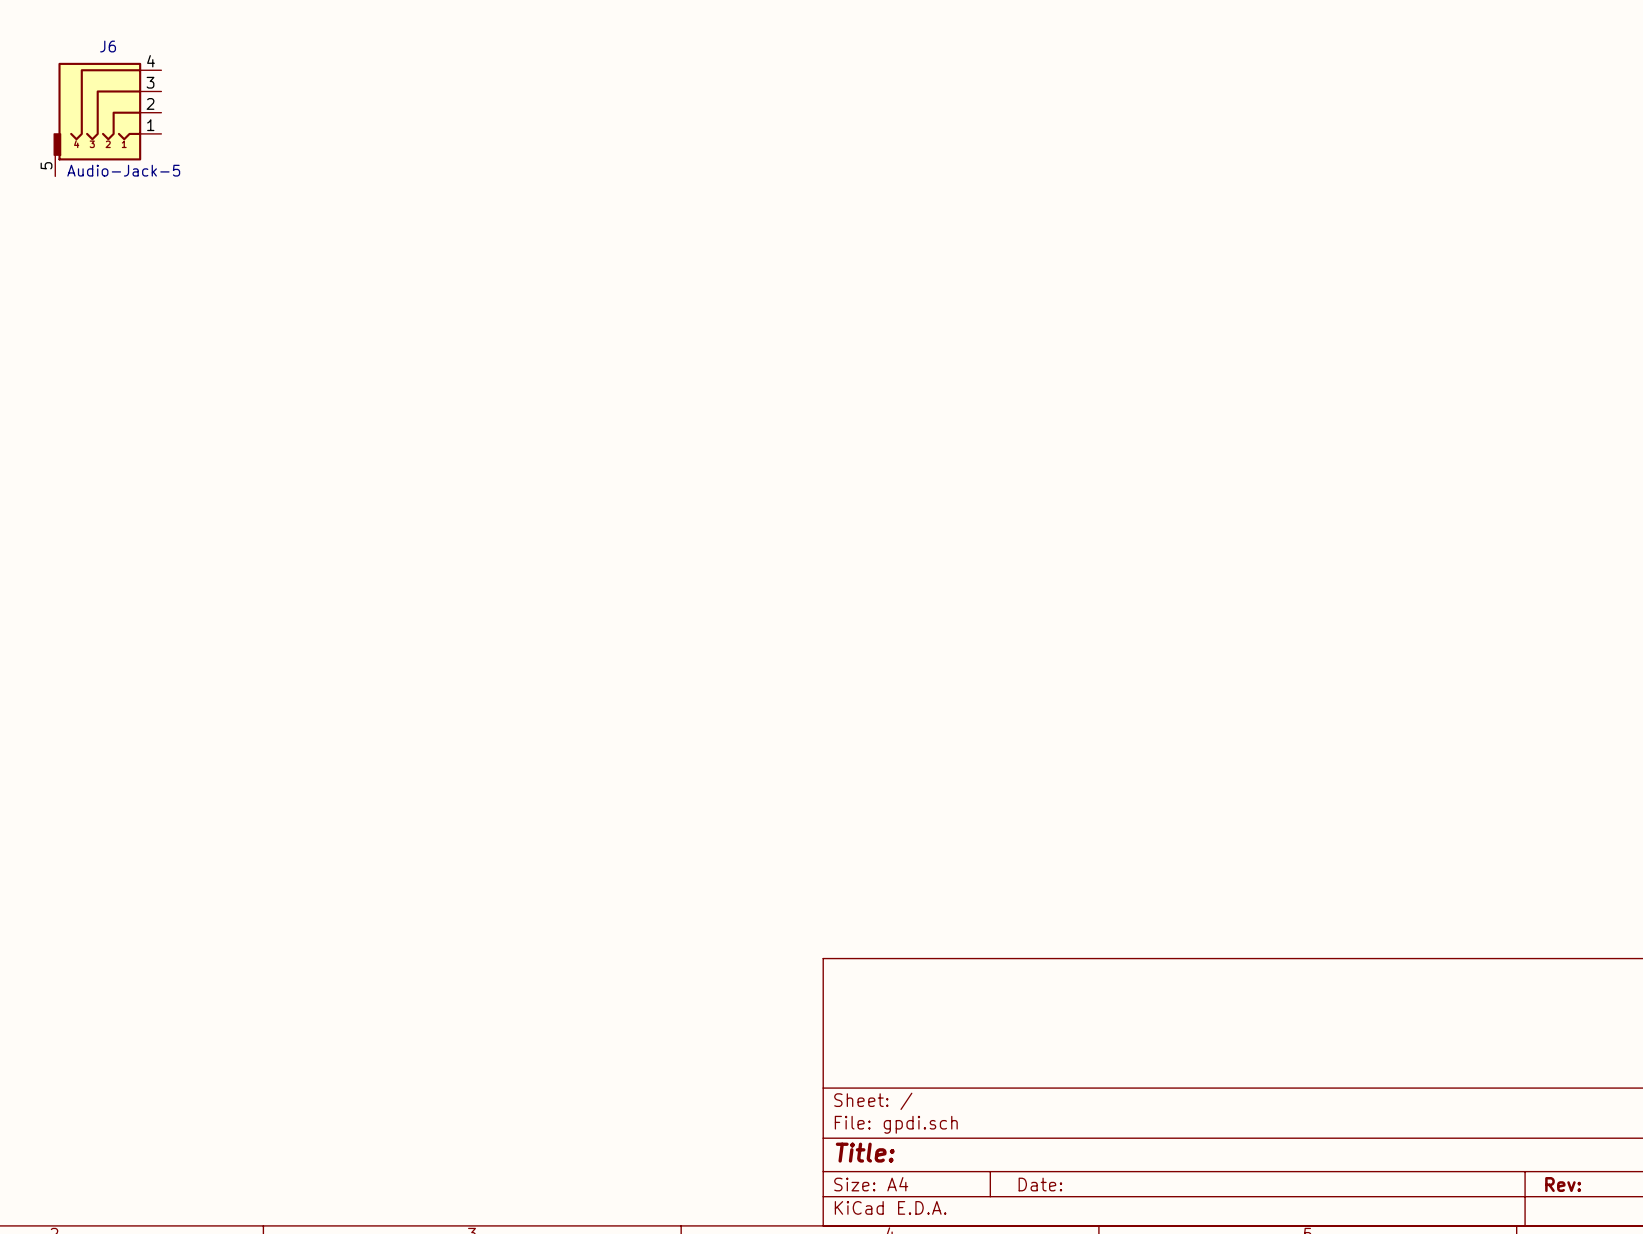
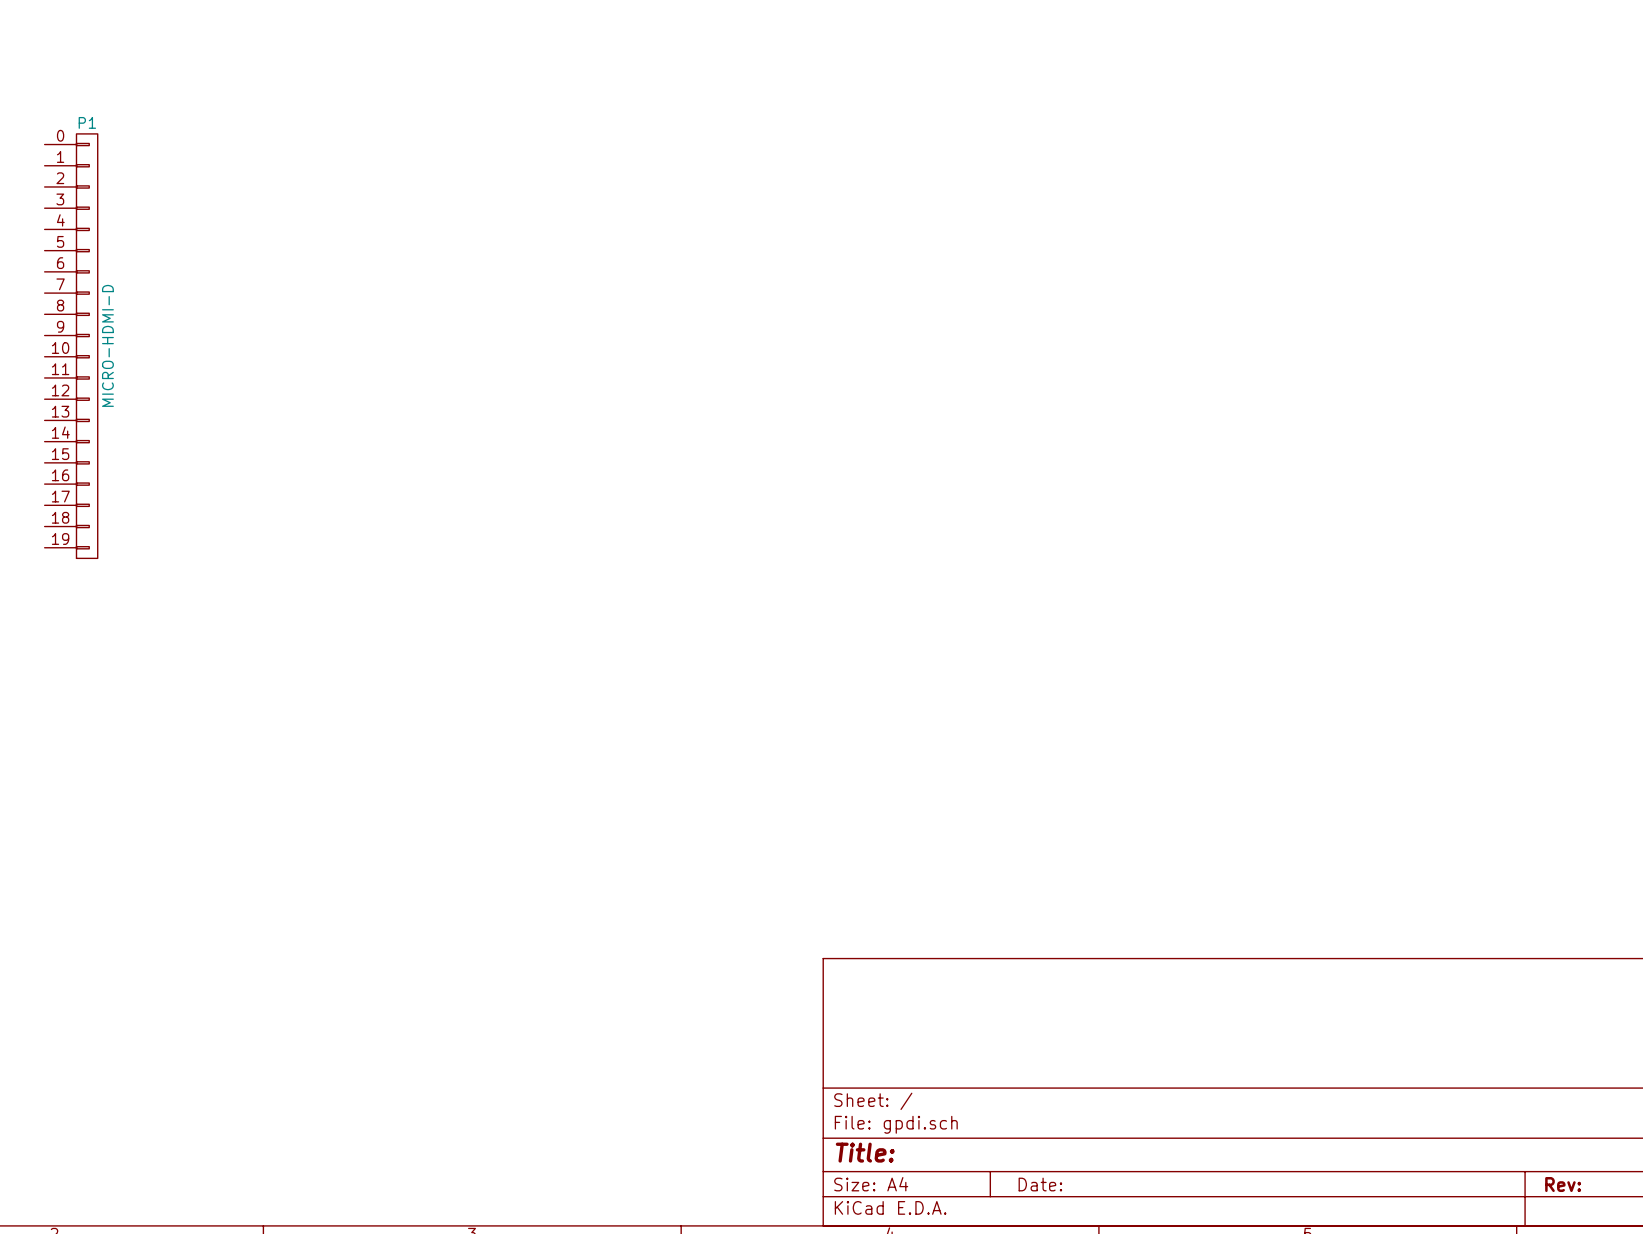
J6: Audio-Jack-5 (107, 119) -> none
P1: none -> MICRO-HDMI-D (71, 346)

